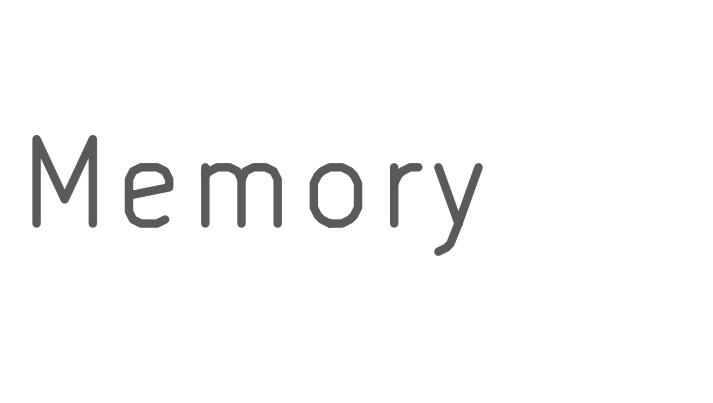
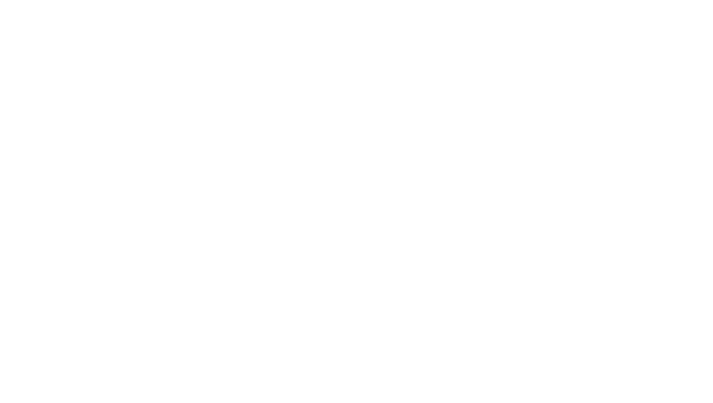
text: Memory (257, 195) -> none

